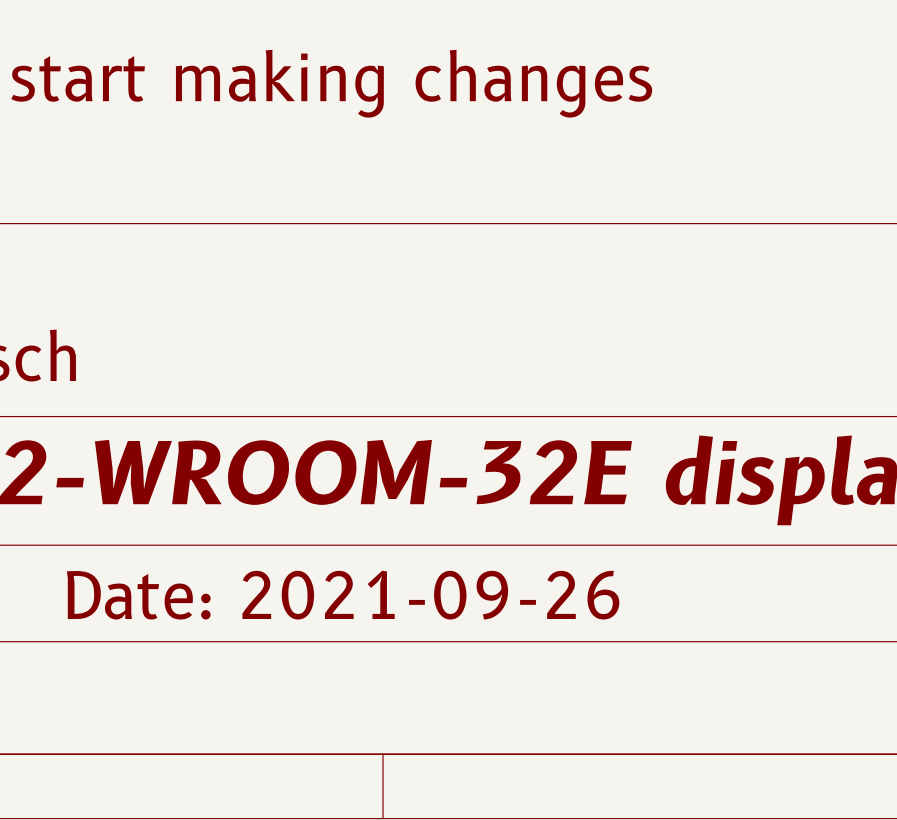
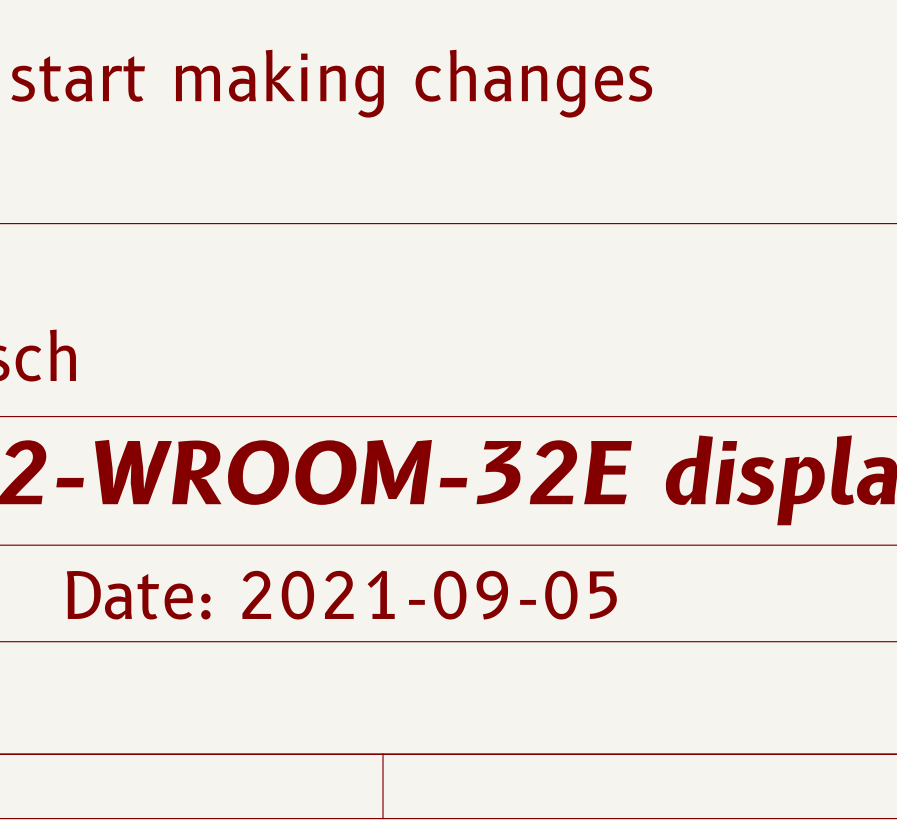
title block: Date: 2021-09-26 (343, 595) -> Date: 2021-09-05 (341, 595)

